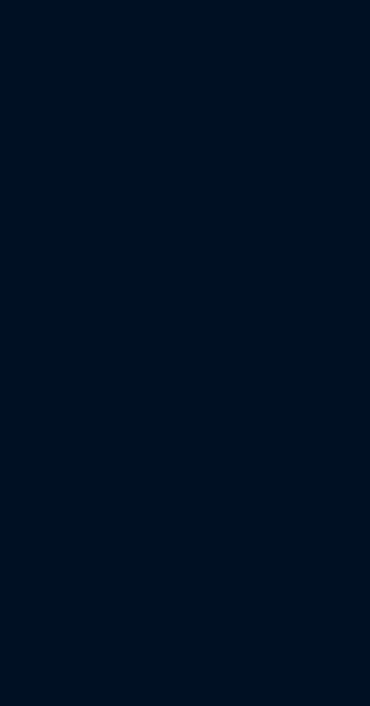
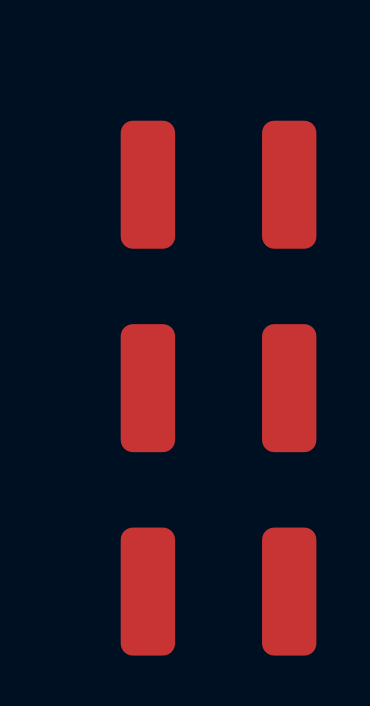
part: none -> (218, 184)
part: none -> (218, 388)
part: none -> (218, 591)

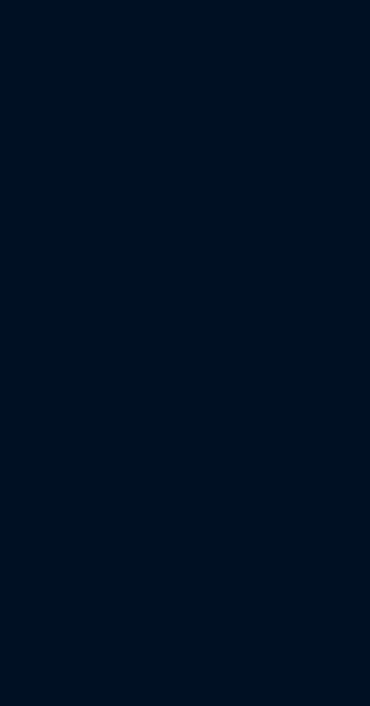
part: (218, 184) -> none
part: (218, 388) -> none
part: (218, 591) -> none

